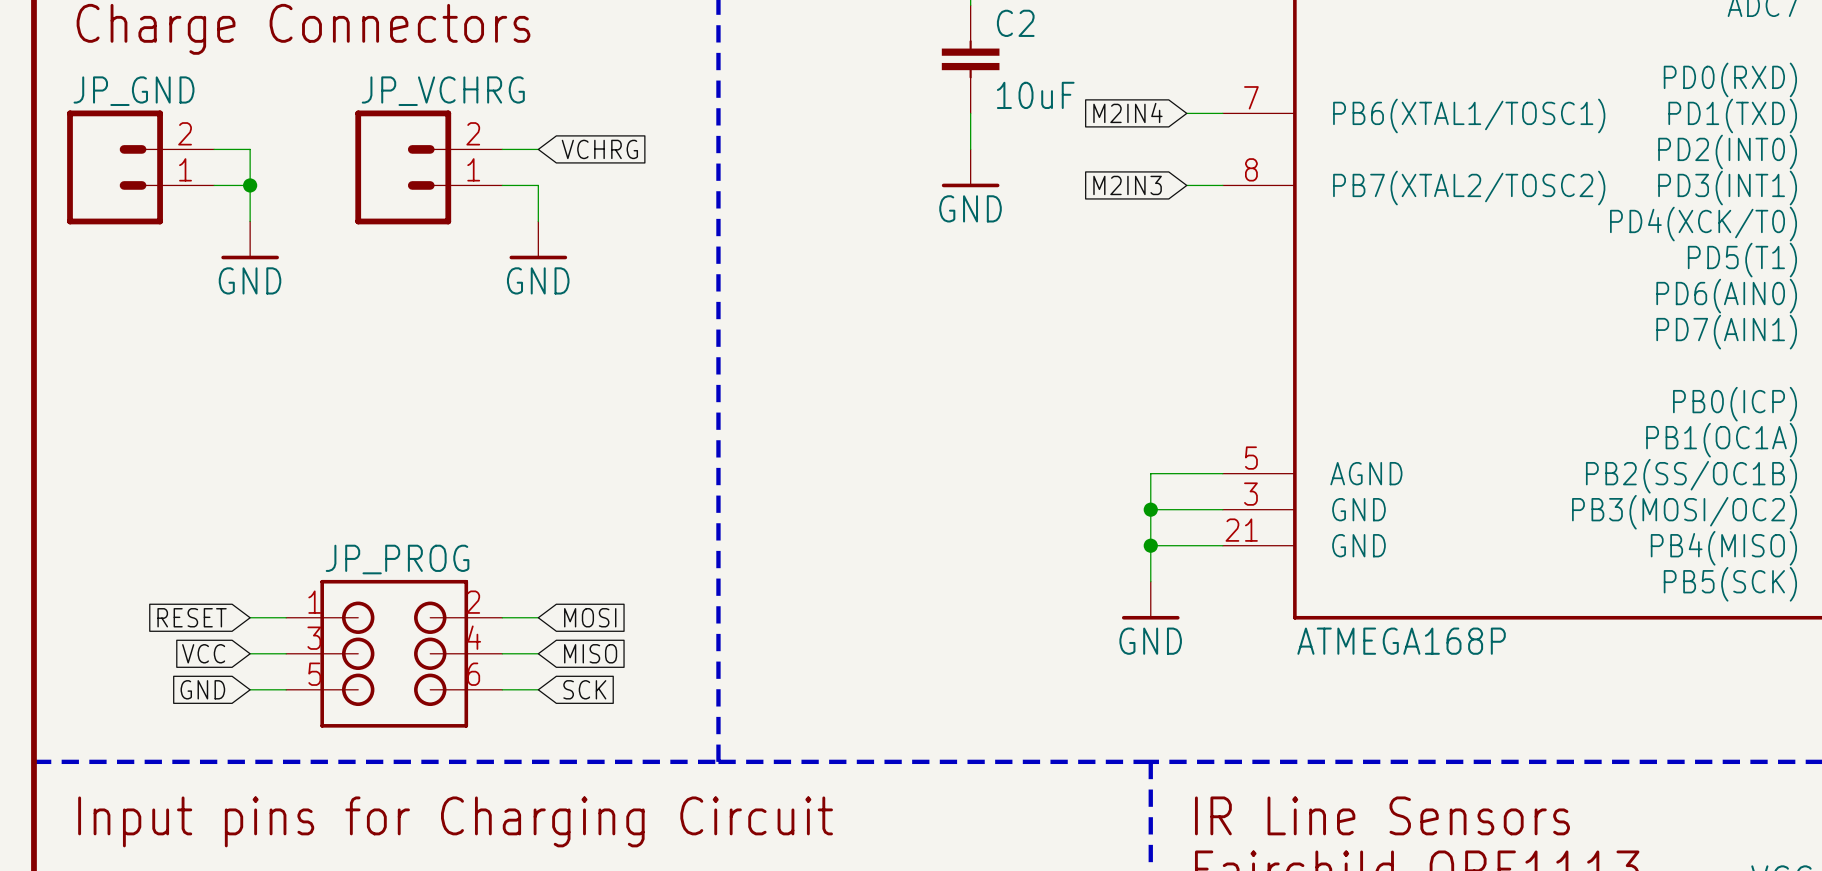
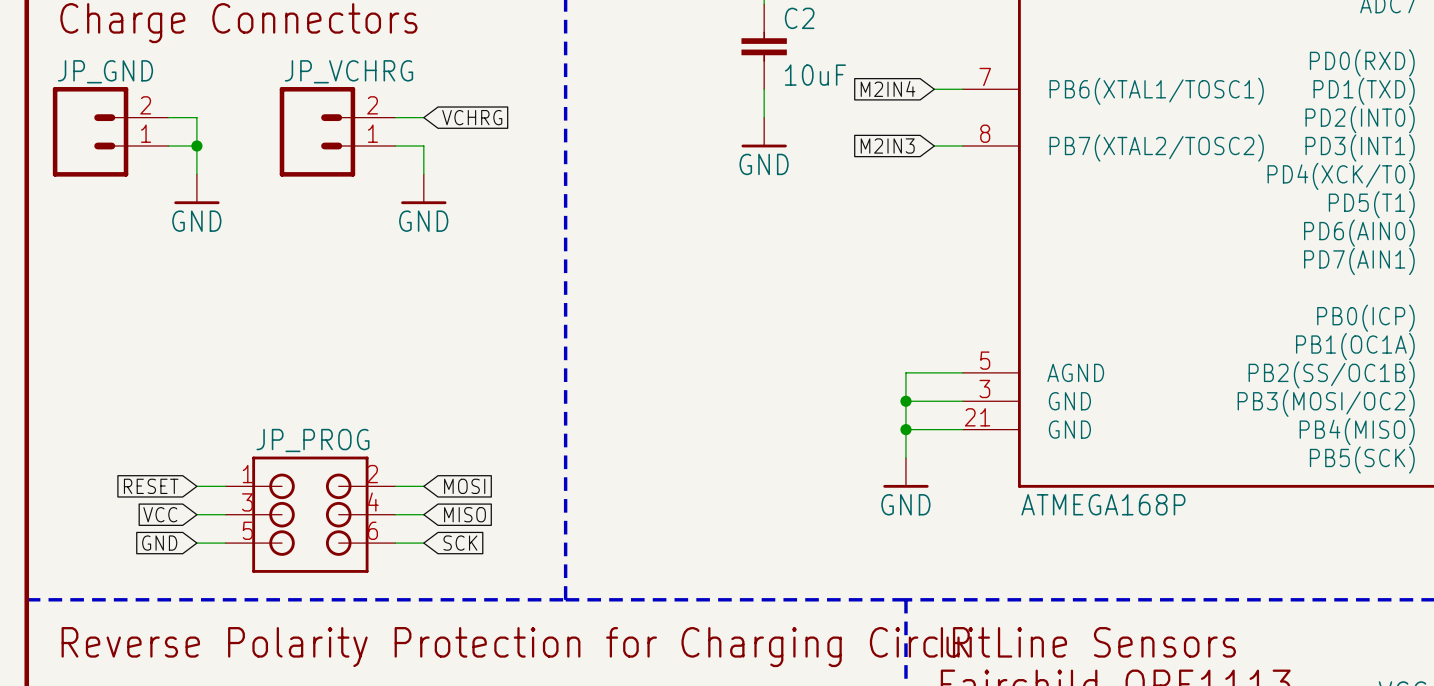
text: Input pins for Charging Circuit (455, 821) -> Reverse Polarity Protection for Charging Circuit (525, 647)

